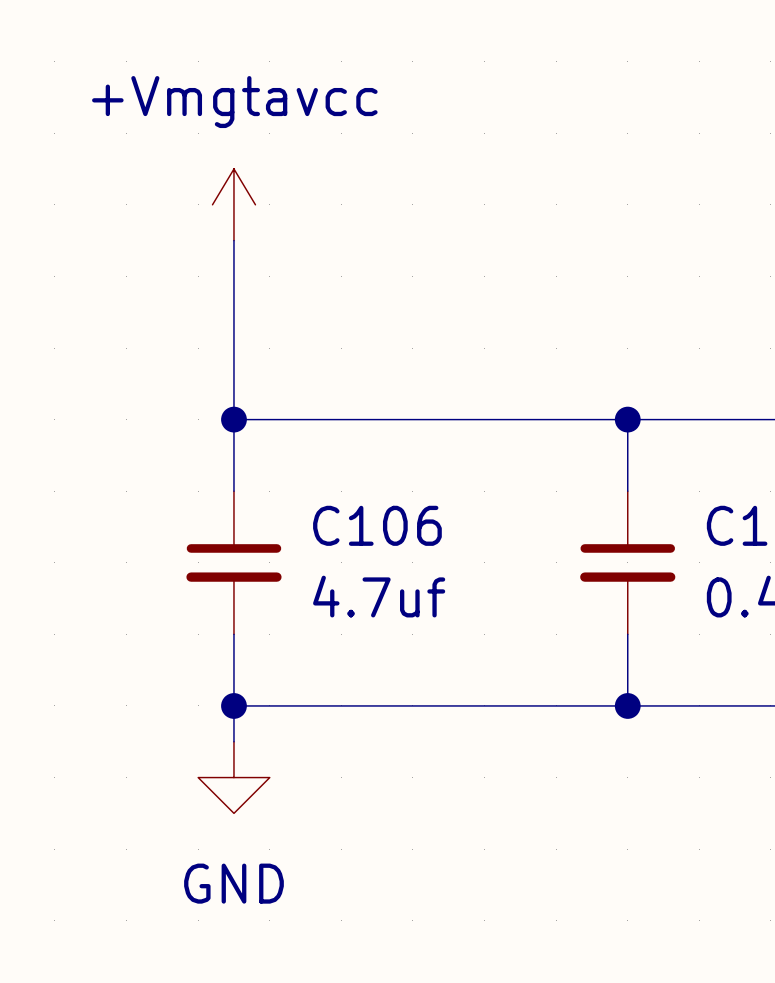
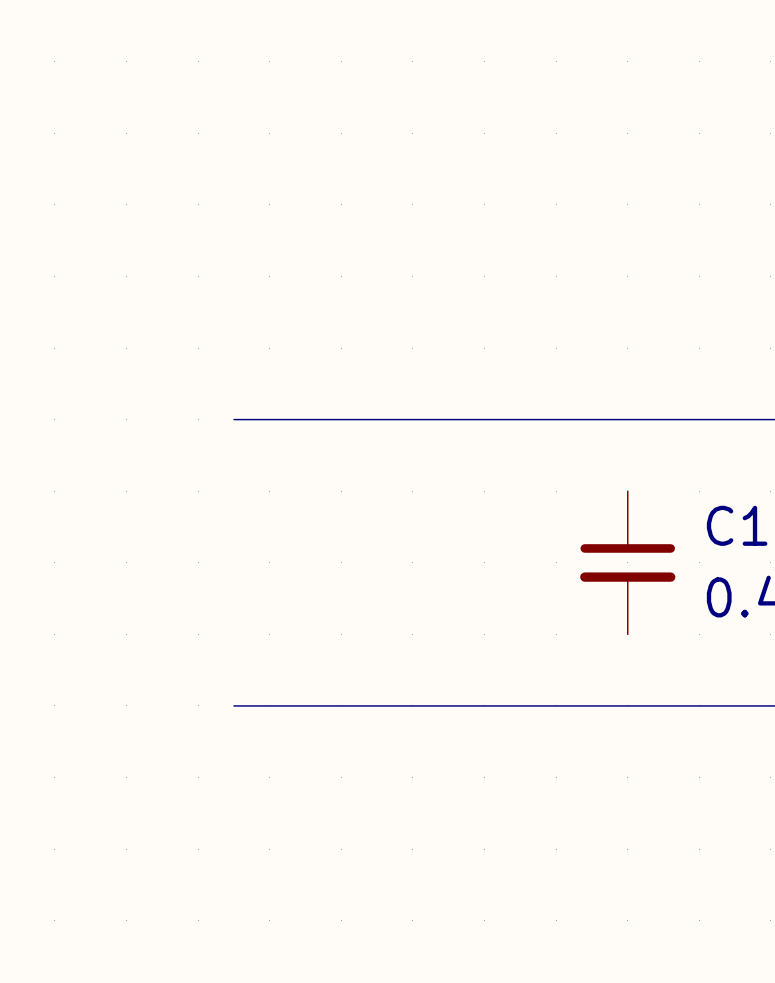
power symbol: +Vmgtavcc (233, 204) -> none
wire: (233, 240) (233, 491) -> none
junction: (233, 419) -> none
wire: (627, 419) (627, 491) -> none
junction: (627, 419) -> none
C106: 4.7uf (233, 562) -> none
wire: (233, 634) (233, 741) -> none
wire: (627, 634) (627, 705) -> none
junction: (233, 705) -> none
junction: (627, 705) -> none
power symbol: GND (233, 777) -> none

